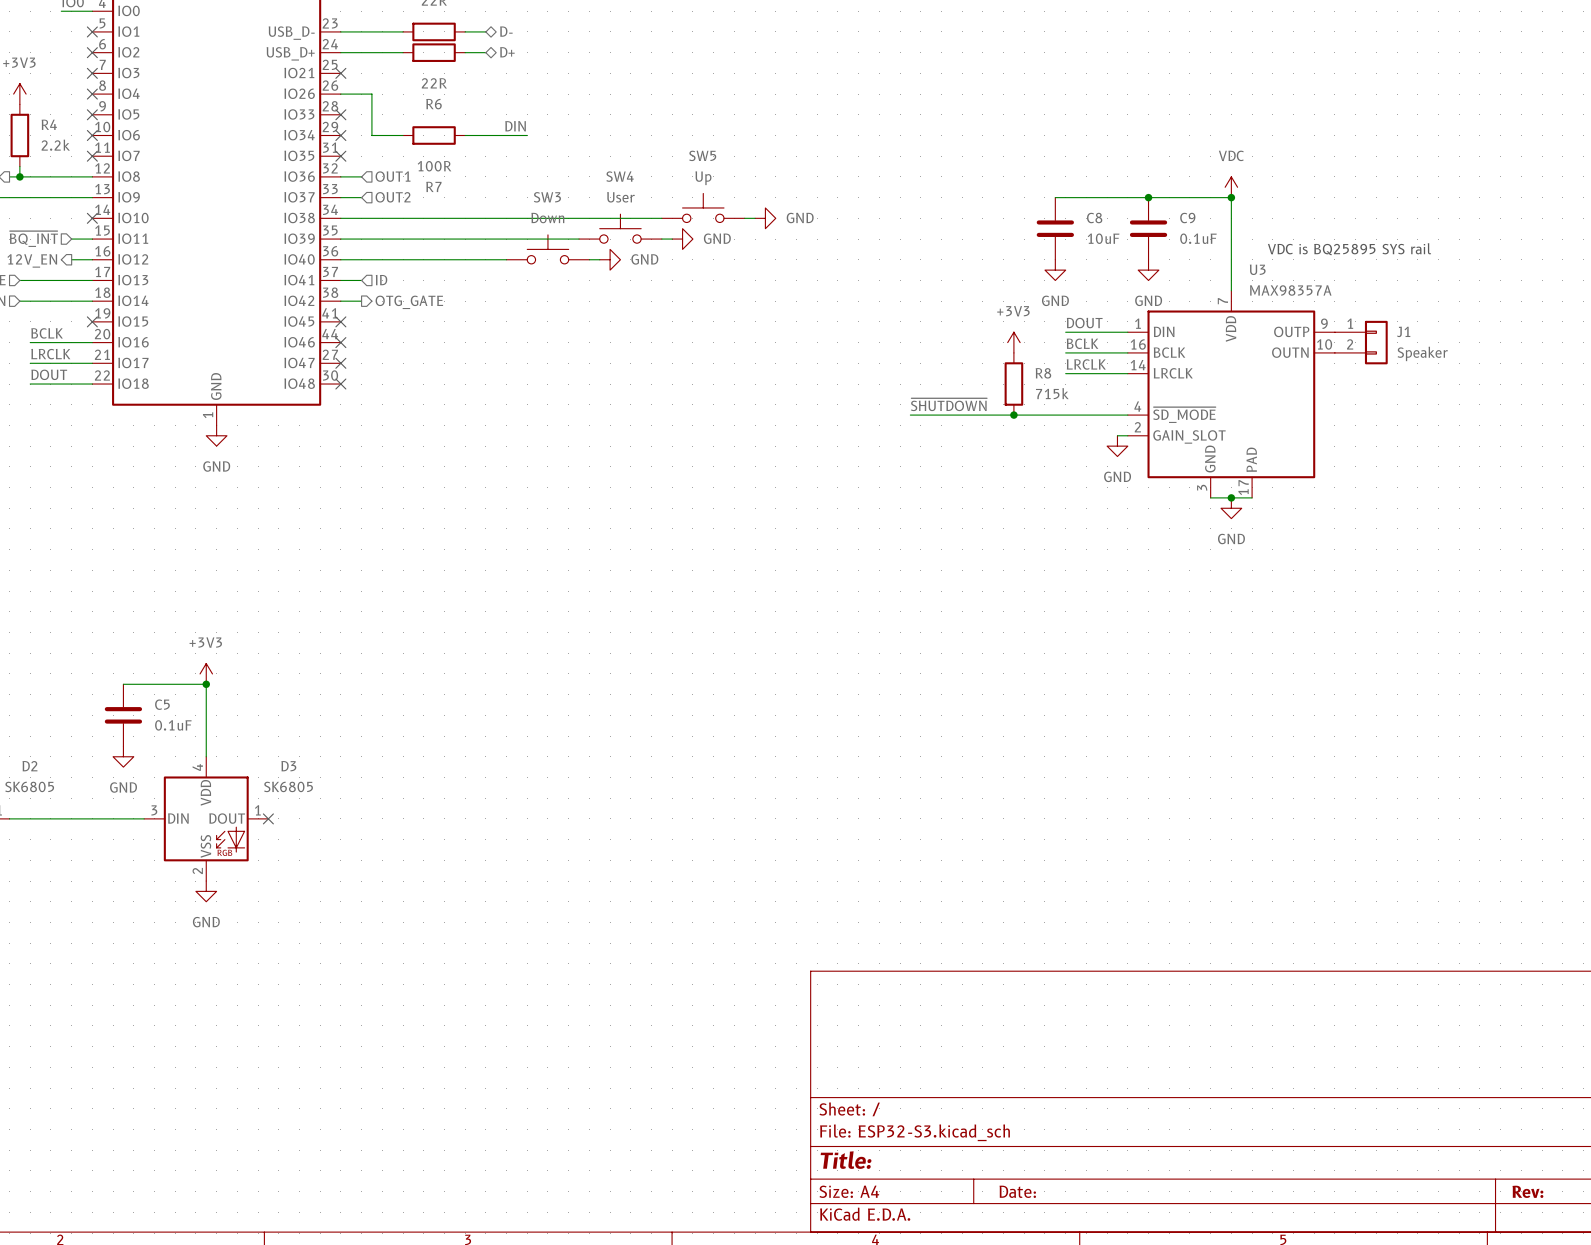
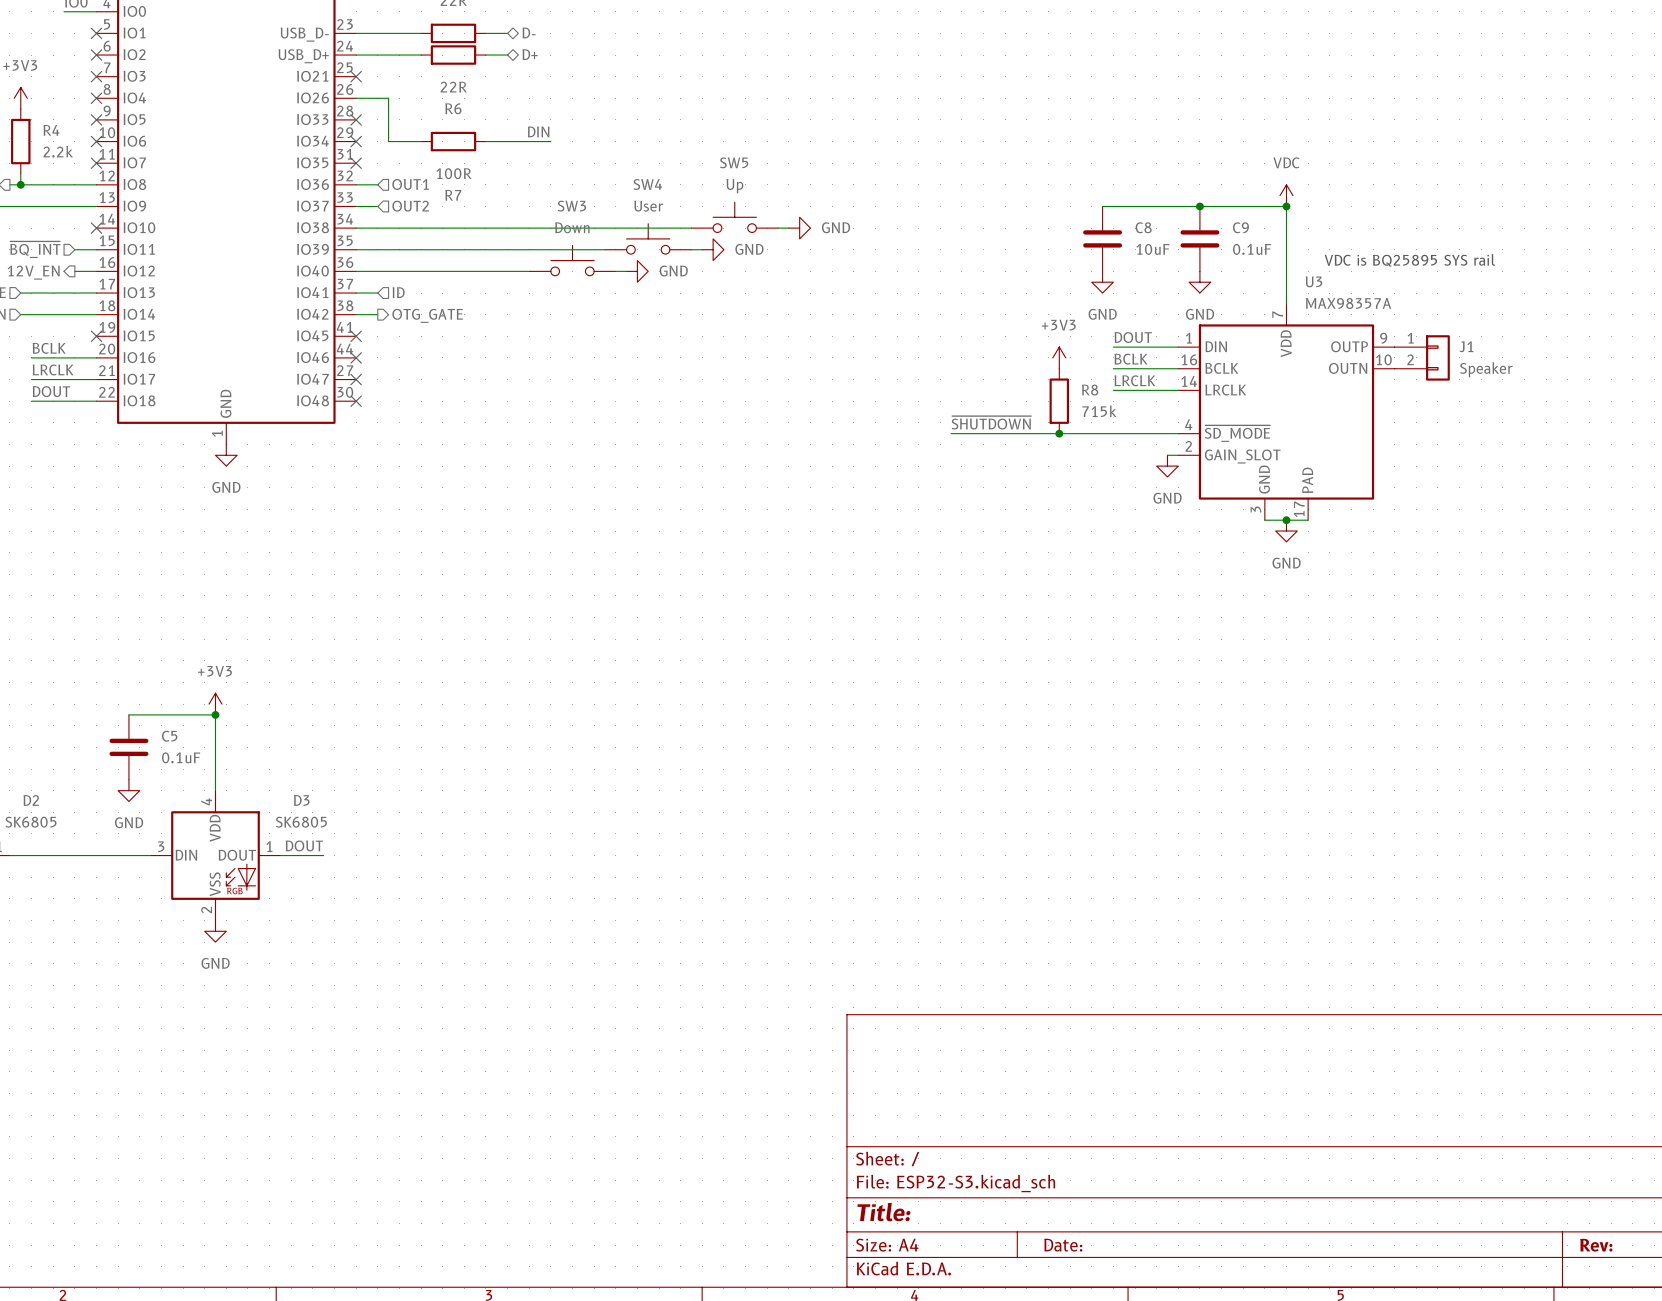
label: none -> DOUT (304, 845)
wire: none -> (280, 855) (323, 855)
no-connect mark: (268, 818) -> none

